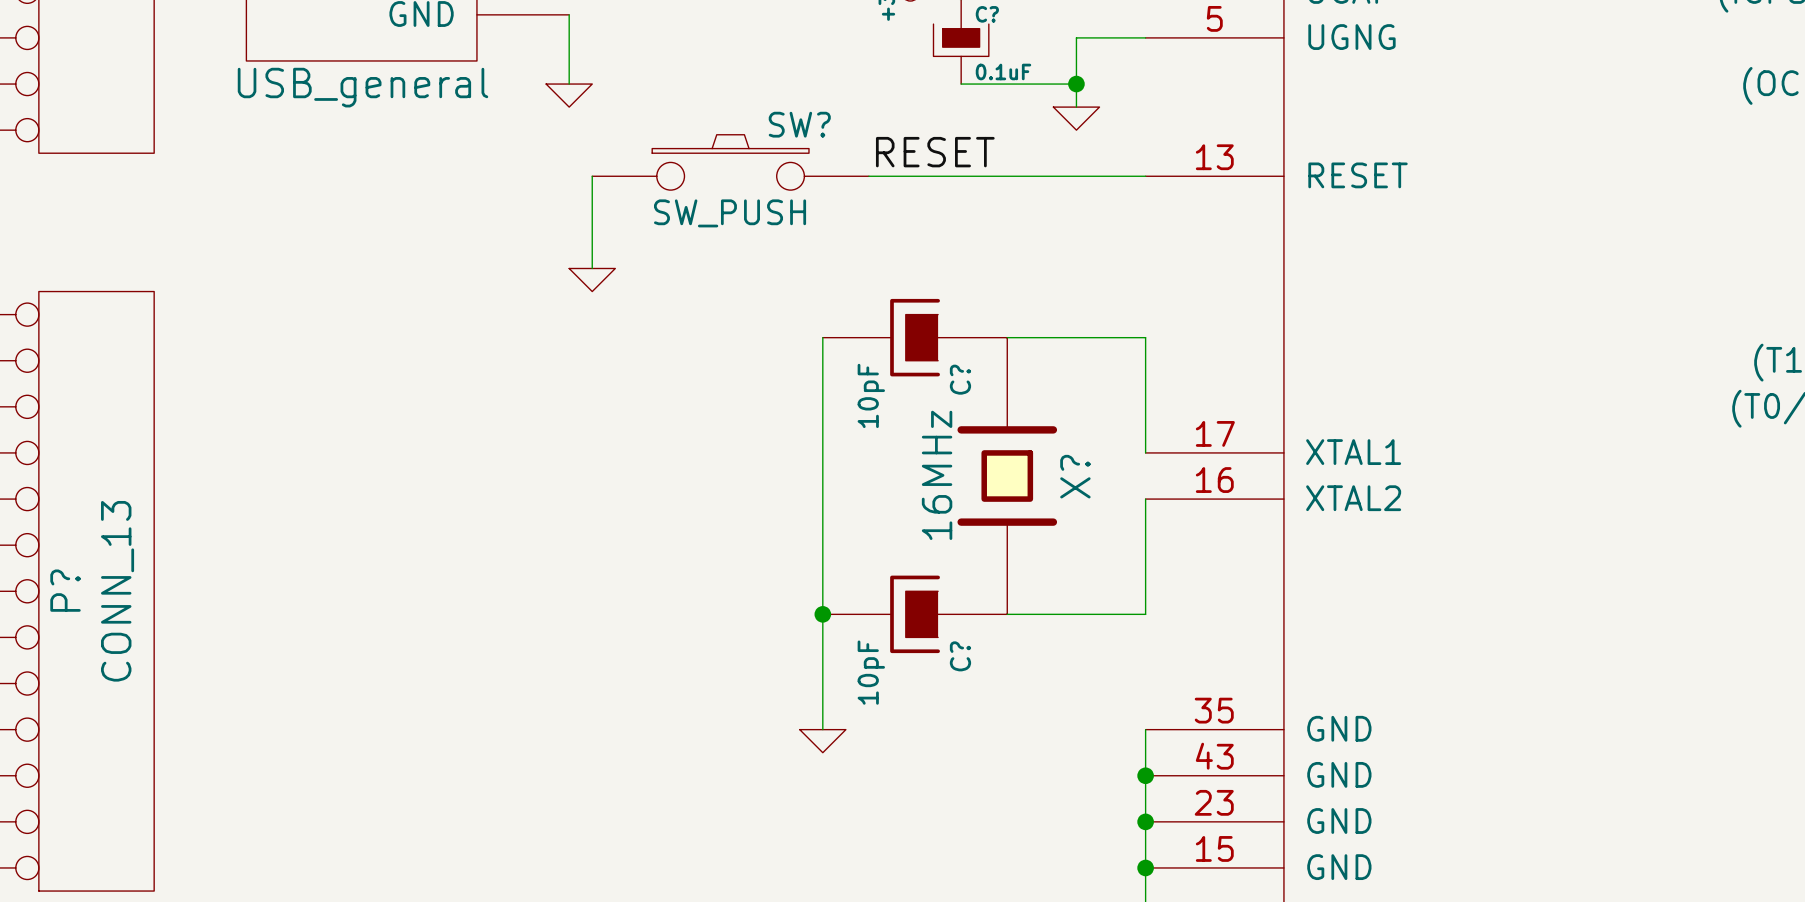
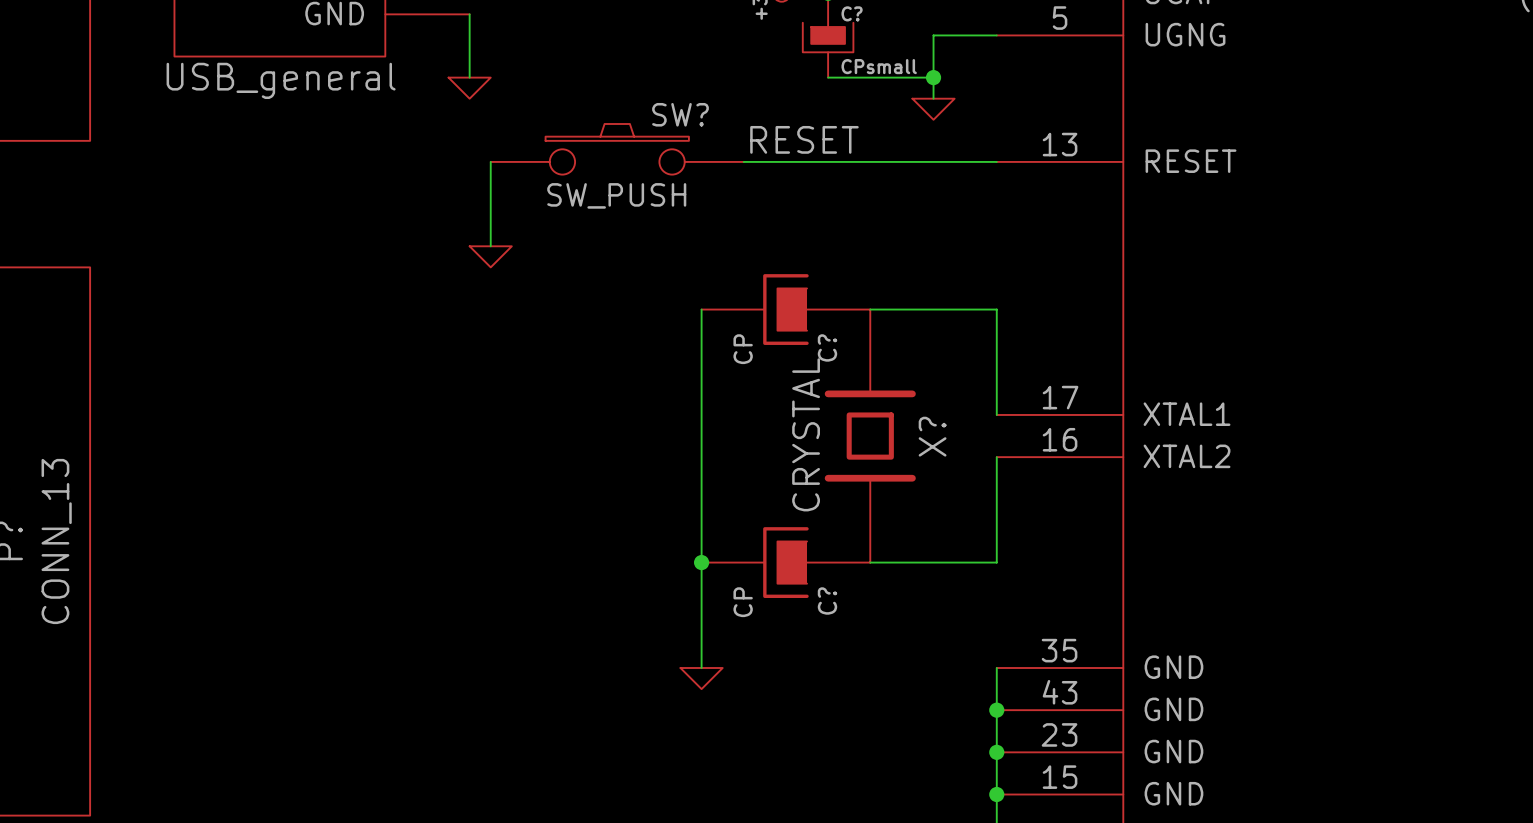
C? value: 0.1uF (1003, 71) -> CPsmall (879, 66)
C? value: 10pF (871, 395) -> CP (743, 349)
X? value: 16MHz (937, 475) -> CRYSTAL (806, 434)
C? value: 10pF (871, 672) -> CP (743, 602)

